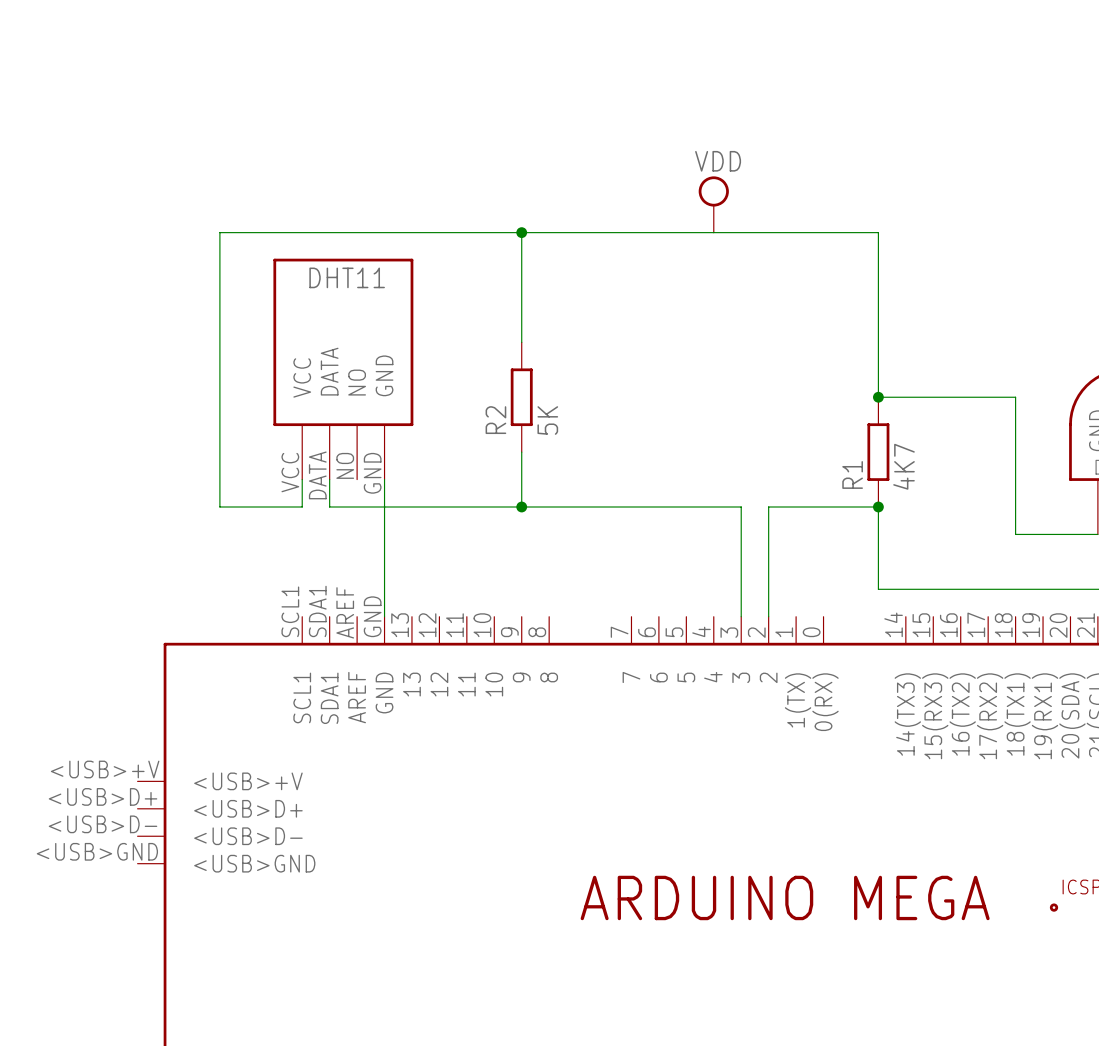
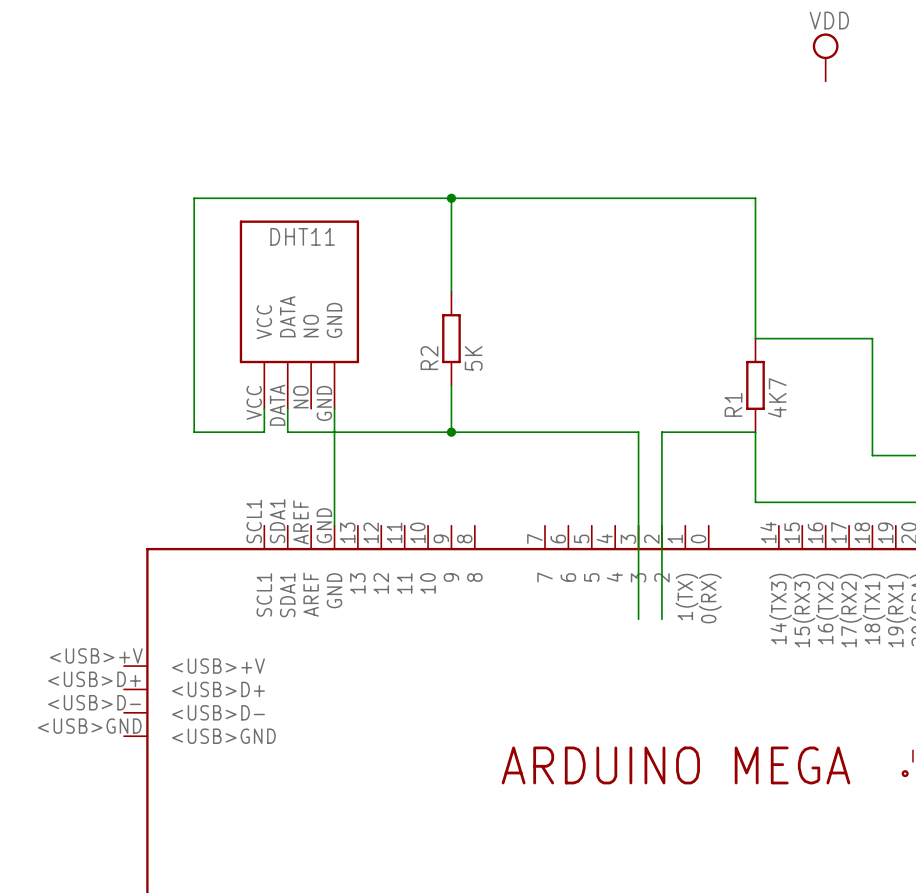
power symbol: none -> VDD (825, 57)
power symbol: VDD (713, 204) -> none
junction: (878, 397) -> none
junction: (878, 506) -> none
wire: none -> (638, 525) (638, 619)
wire: none -> (661, 525) (661, 619)

